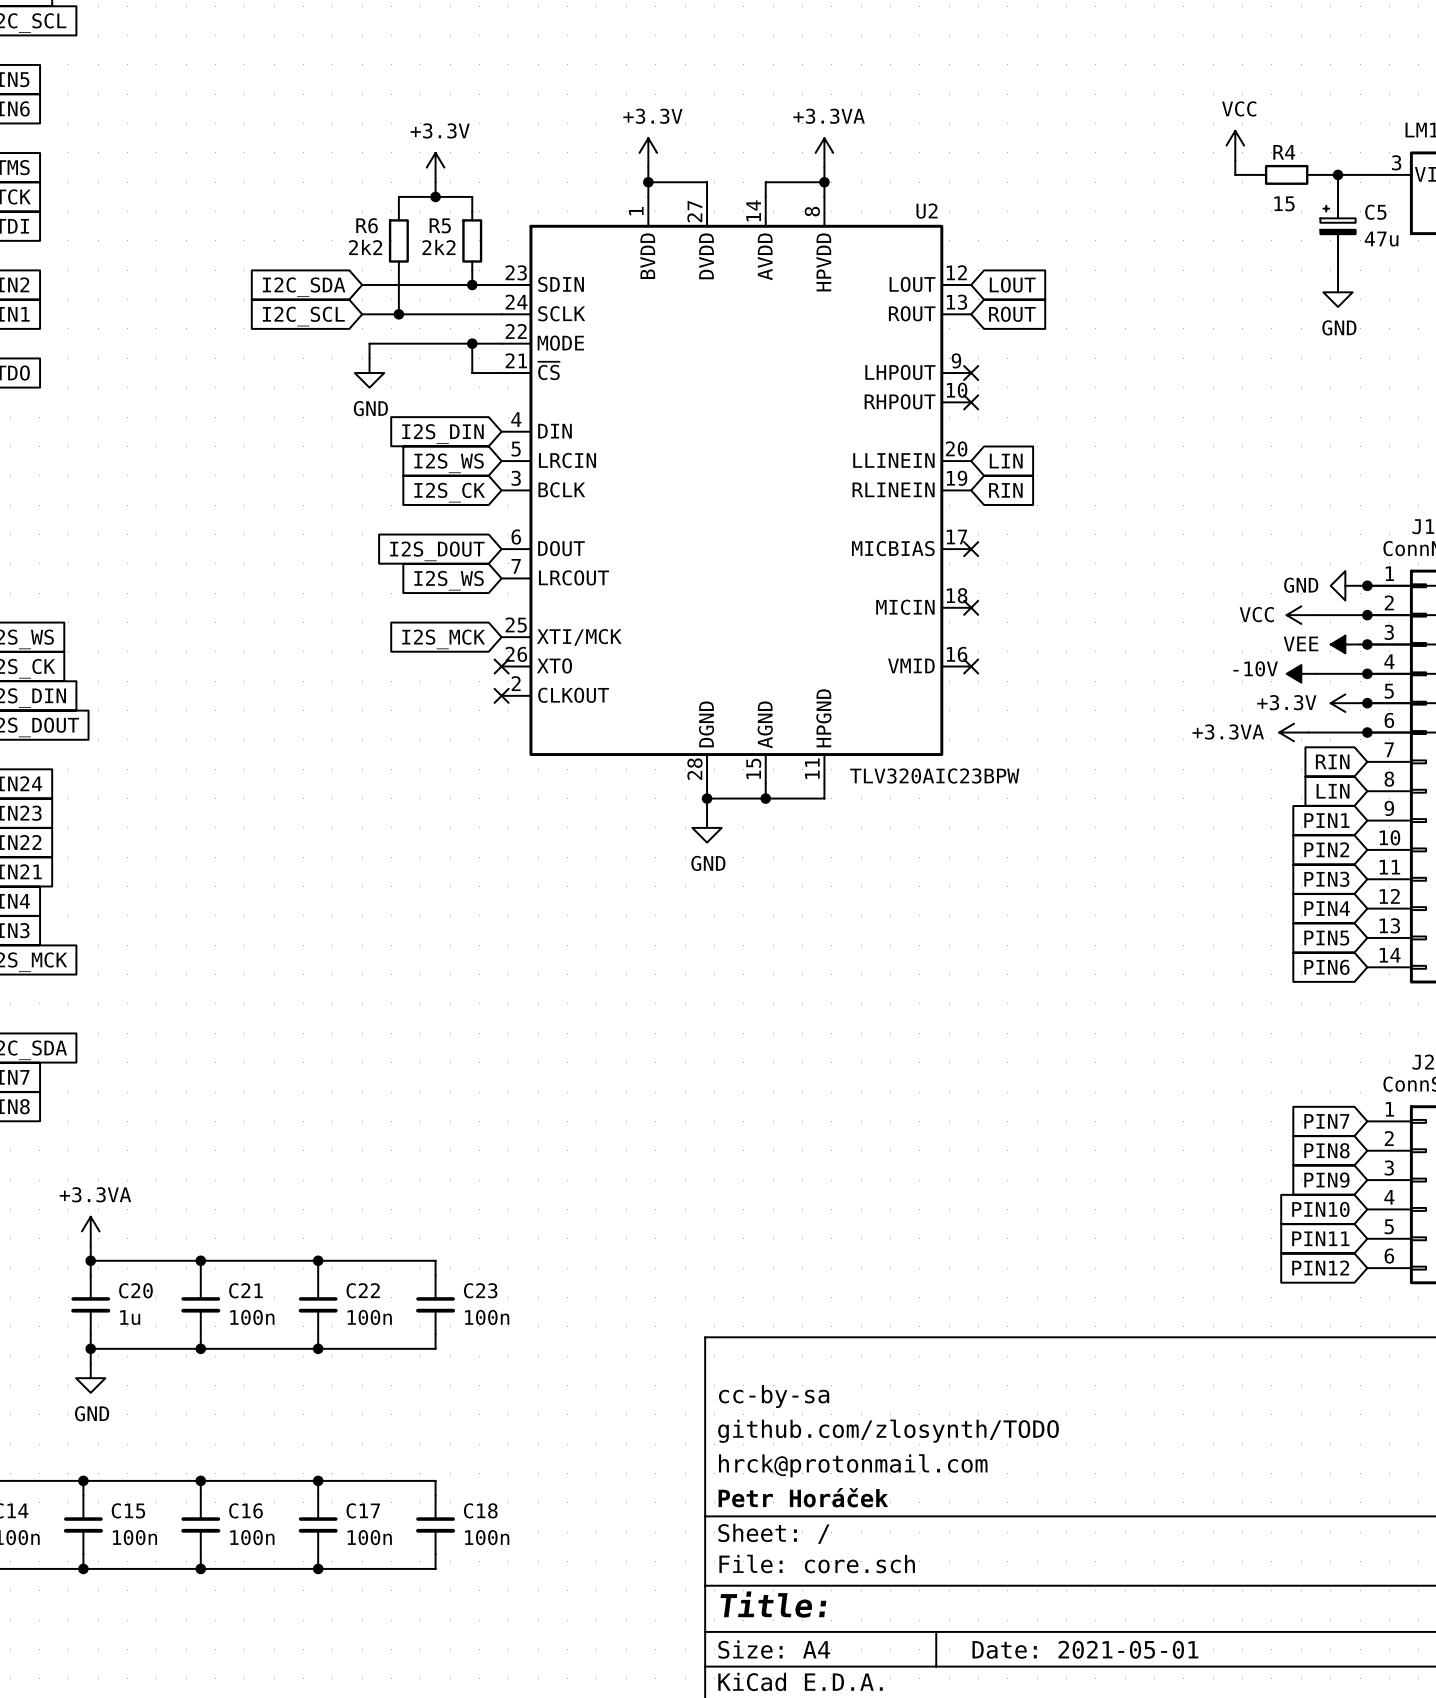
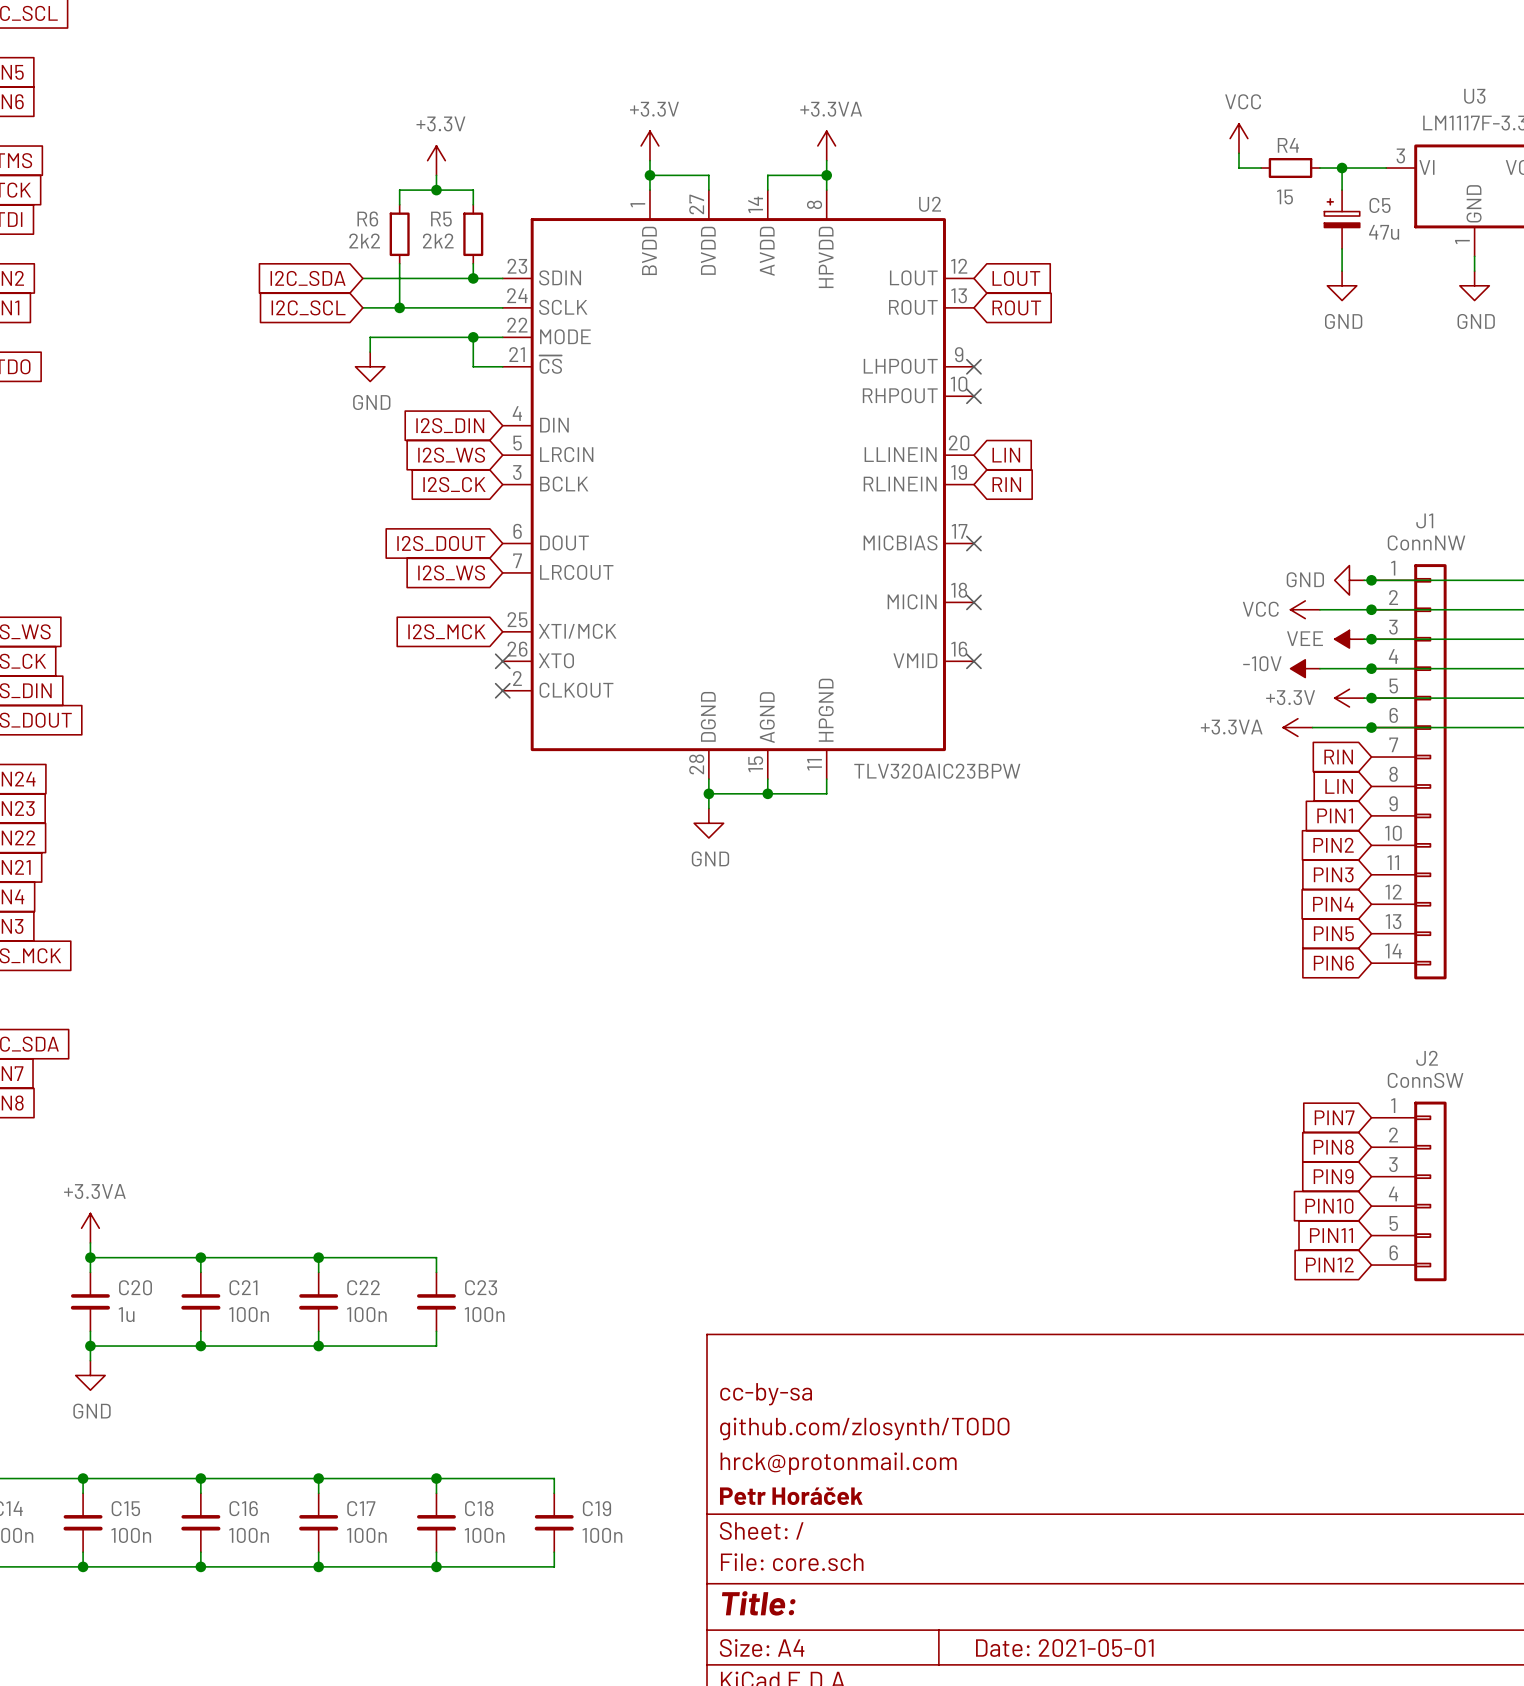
wire: none -> (436, 1478) (554, 1478) (554, 1493)
junction: none -> (436, 1478)
C19: none -> 100n (554, 1522)
wire: none -> (554, 1552) (554, 1566) (436, 1566)
junction: none -> (436, 1566)

